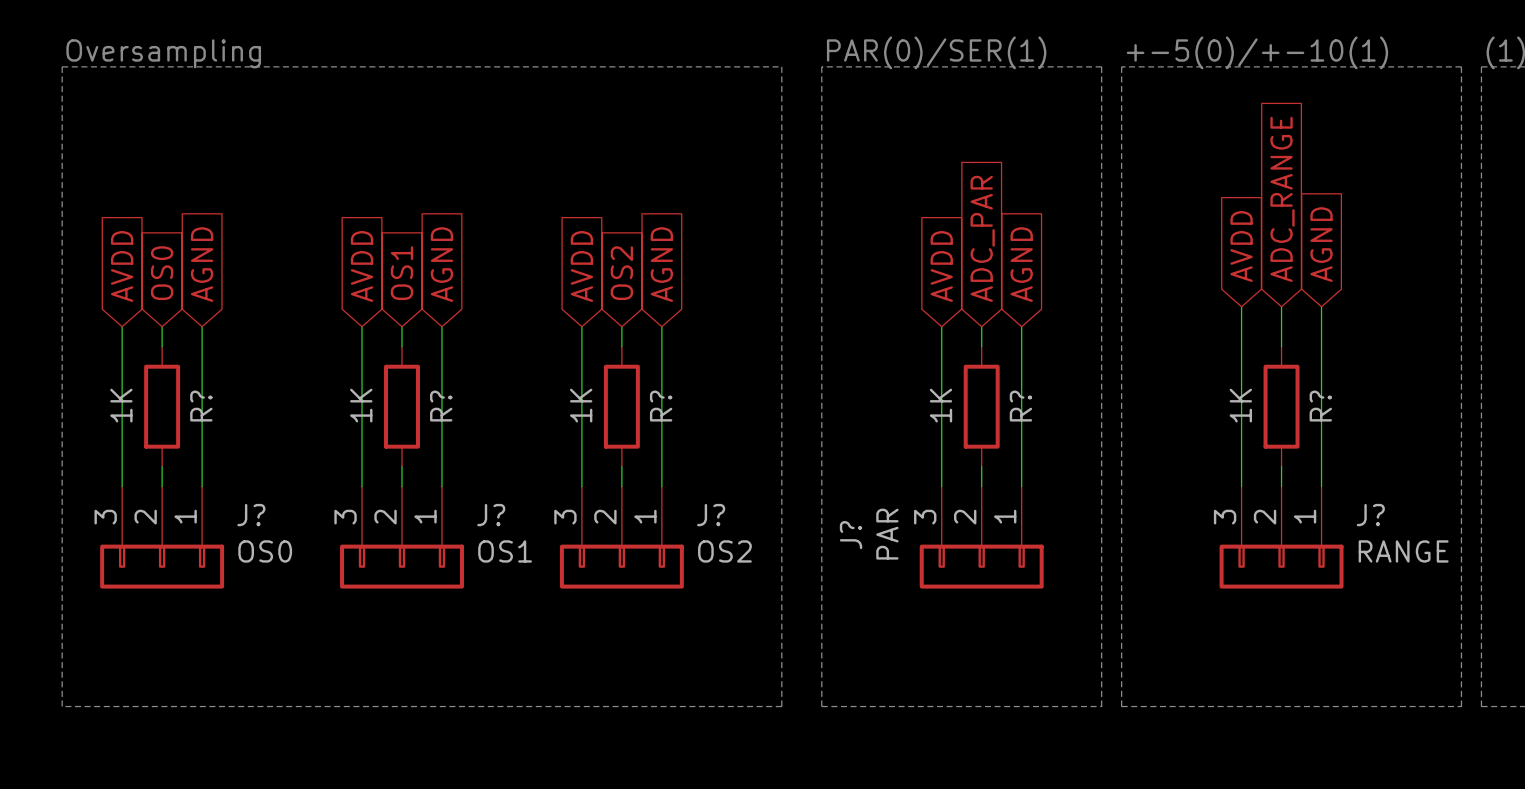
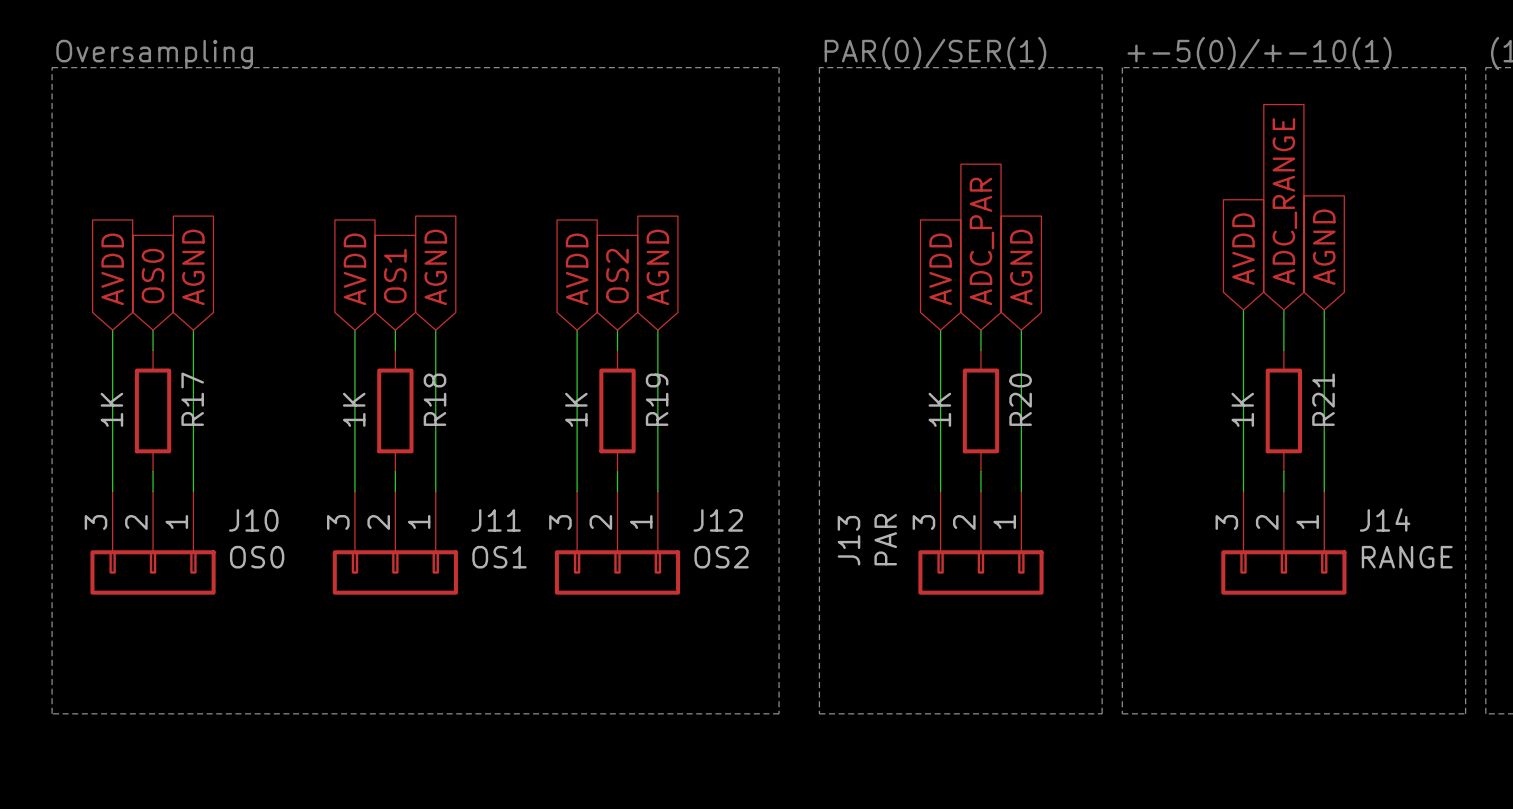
R? name: R? (201, 406) -> R17 (192, 399)
R? name: R? (441, 406) -> R18 (434, 399)
R? name: R? (661, 406) -> R19 (657, 399)
R? name: R? (1020, 406) -> R20 (1020, 399)
R? name: R? (1320, 406) -> R21 (1323, 399)
J? name: J? (251, 515) -> J10 (253, 520)
J? name: J? (491, 515) -> J11 (496, 520)
J? name: J? (711, 515) -> J12 (718, 520)
J? name: J? (1370, 515) -> J14 (1385, 519)
J? name: J? (851, 535) -> J13 (848, 540)

